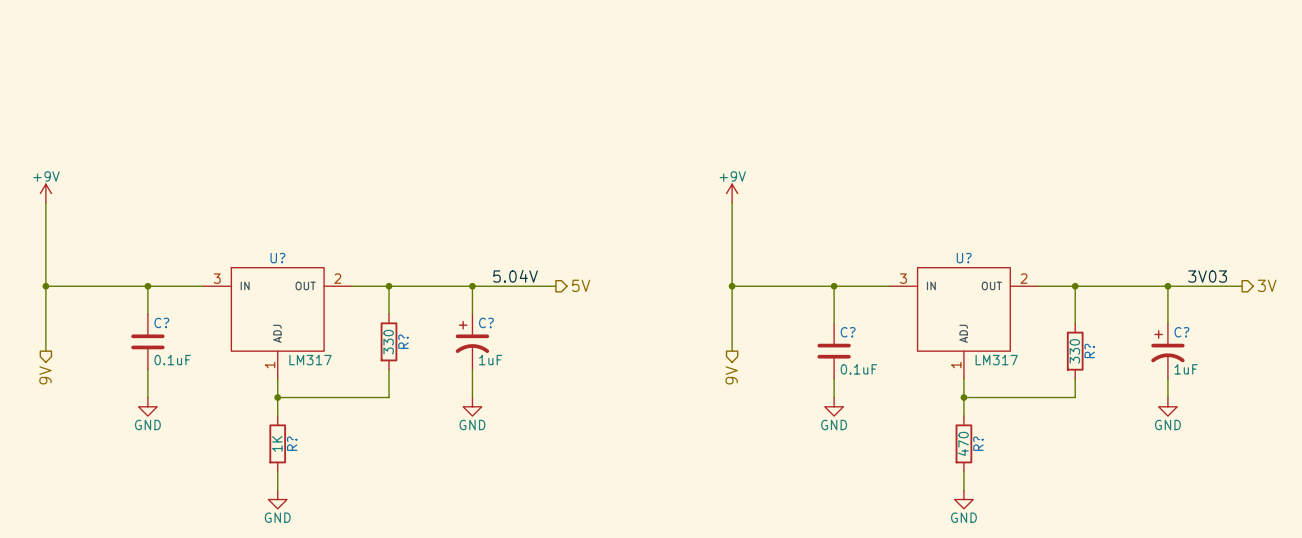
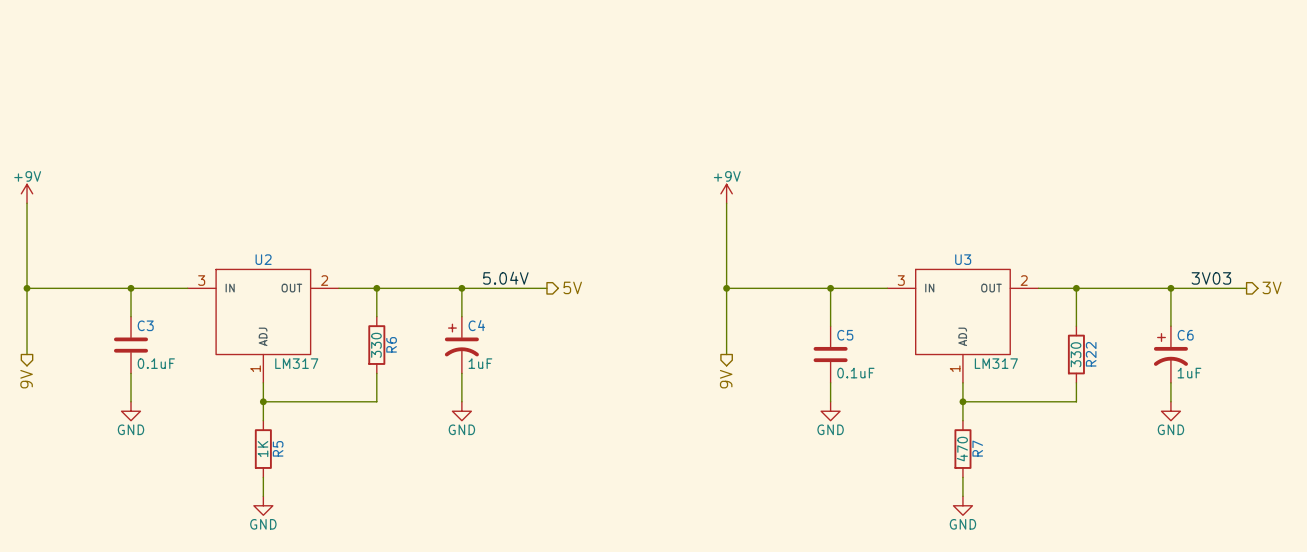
U? name: U? (277, 258) -> U2 (263, 259)
U? name: U? (964, 258) -> U3 (963, 259)
C? name: C? (161, 322) -> C3 (145, 325)
C? name: C? (486, 322) -> C4 (476, 325)
C? name: C? (848, 332) -> C5 (845, 335)
C? name: C? (1181, 332) -> C6 (1185, 335)
R? name: R? (403, 341) -> R6 (391, 344)
R? name: R? (1089, 350) -> R22 (1091, 354)
R? name: R? (292, 443) -> R5 (278, 448)
R? name: R? (978, 443) -> R7 (977, 448)

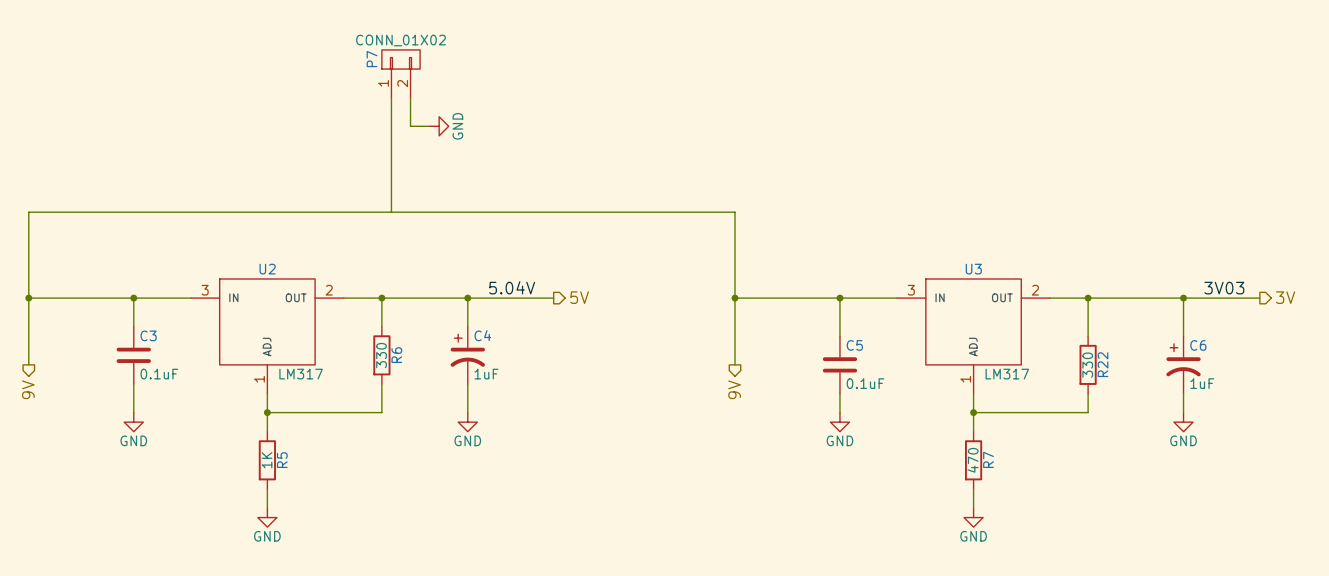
P7: none -> CONN_01X02 (400, 73)
wire: none -> (391, 97) (391, 212)
wire: none -> (410, 97) (410, 126) (429, 126)
power symbol: none -> GND (439, 126)
power symbol: +9V (27, 193) -> none
power symbol: +9V (726, 193) -> none
wire: none -> (28, 212) (735, 212)

